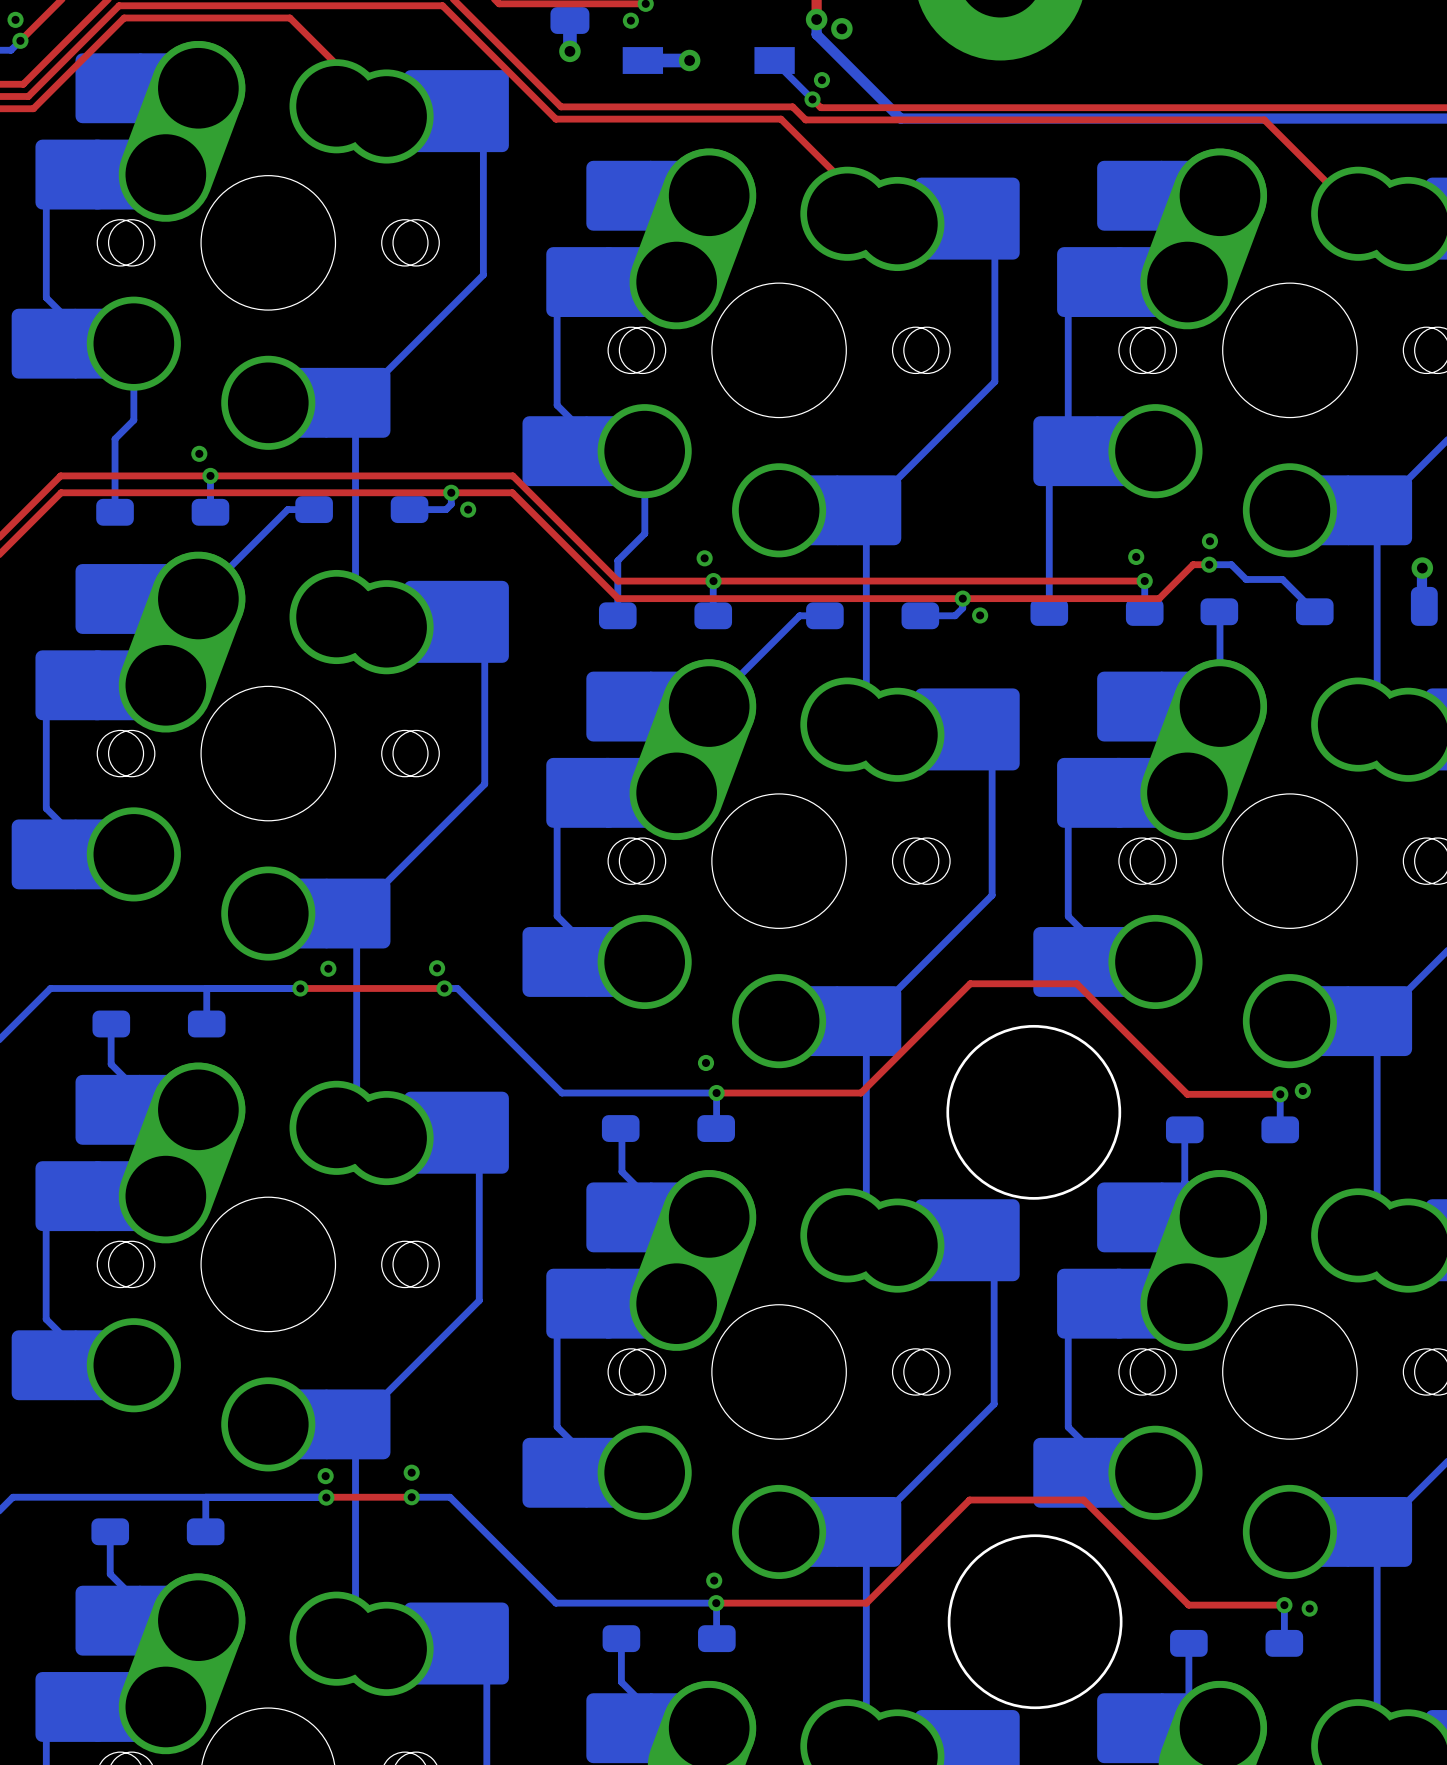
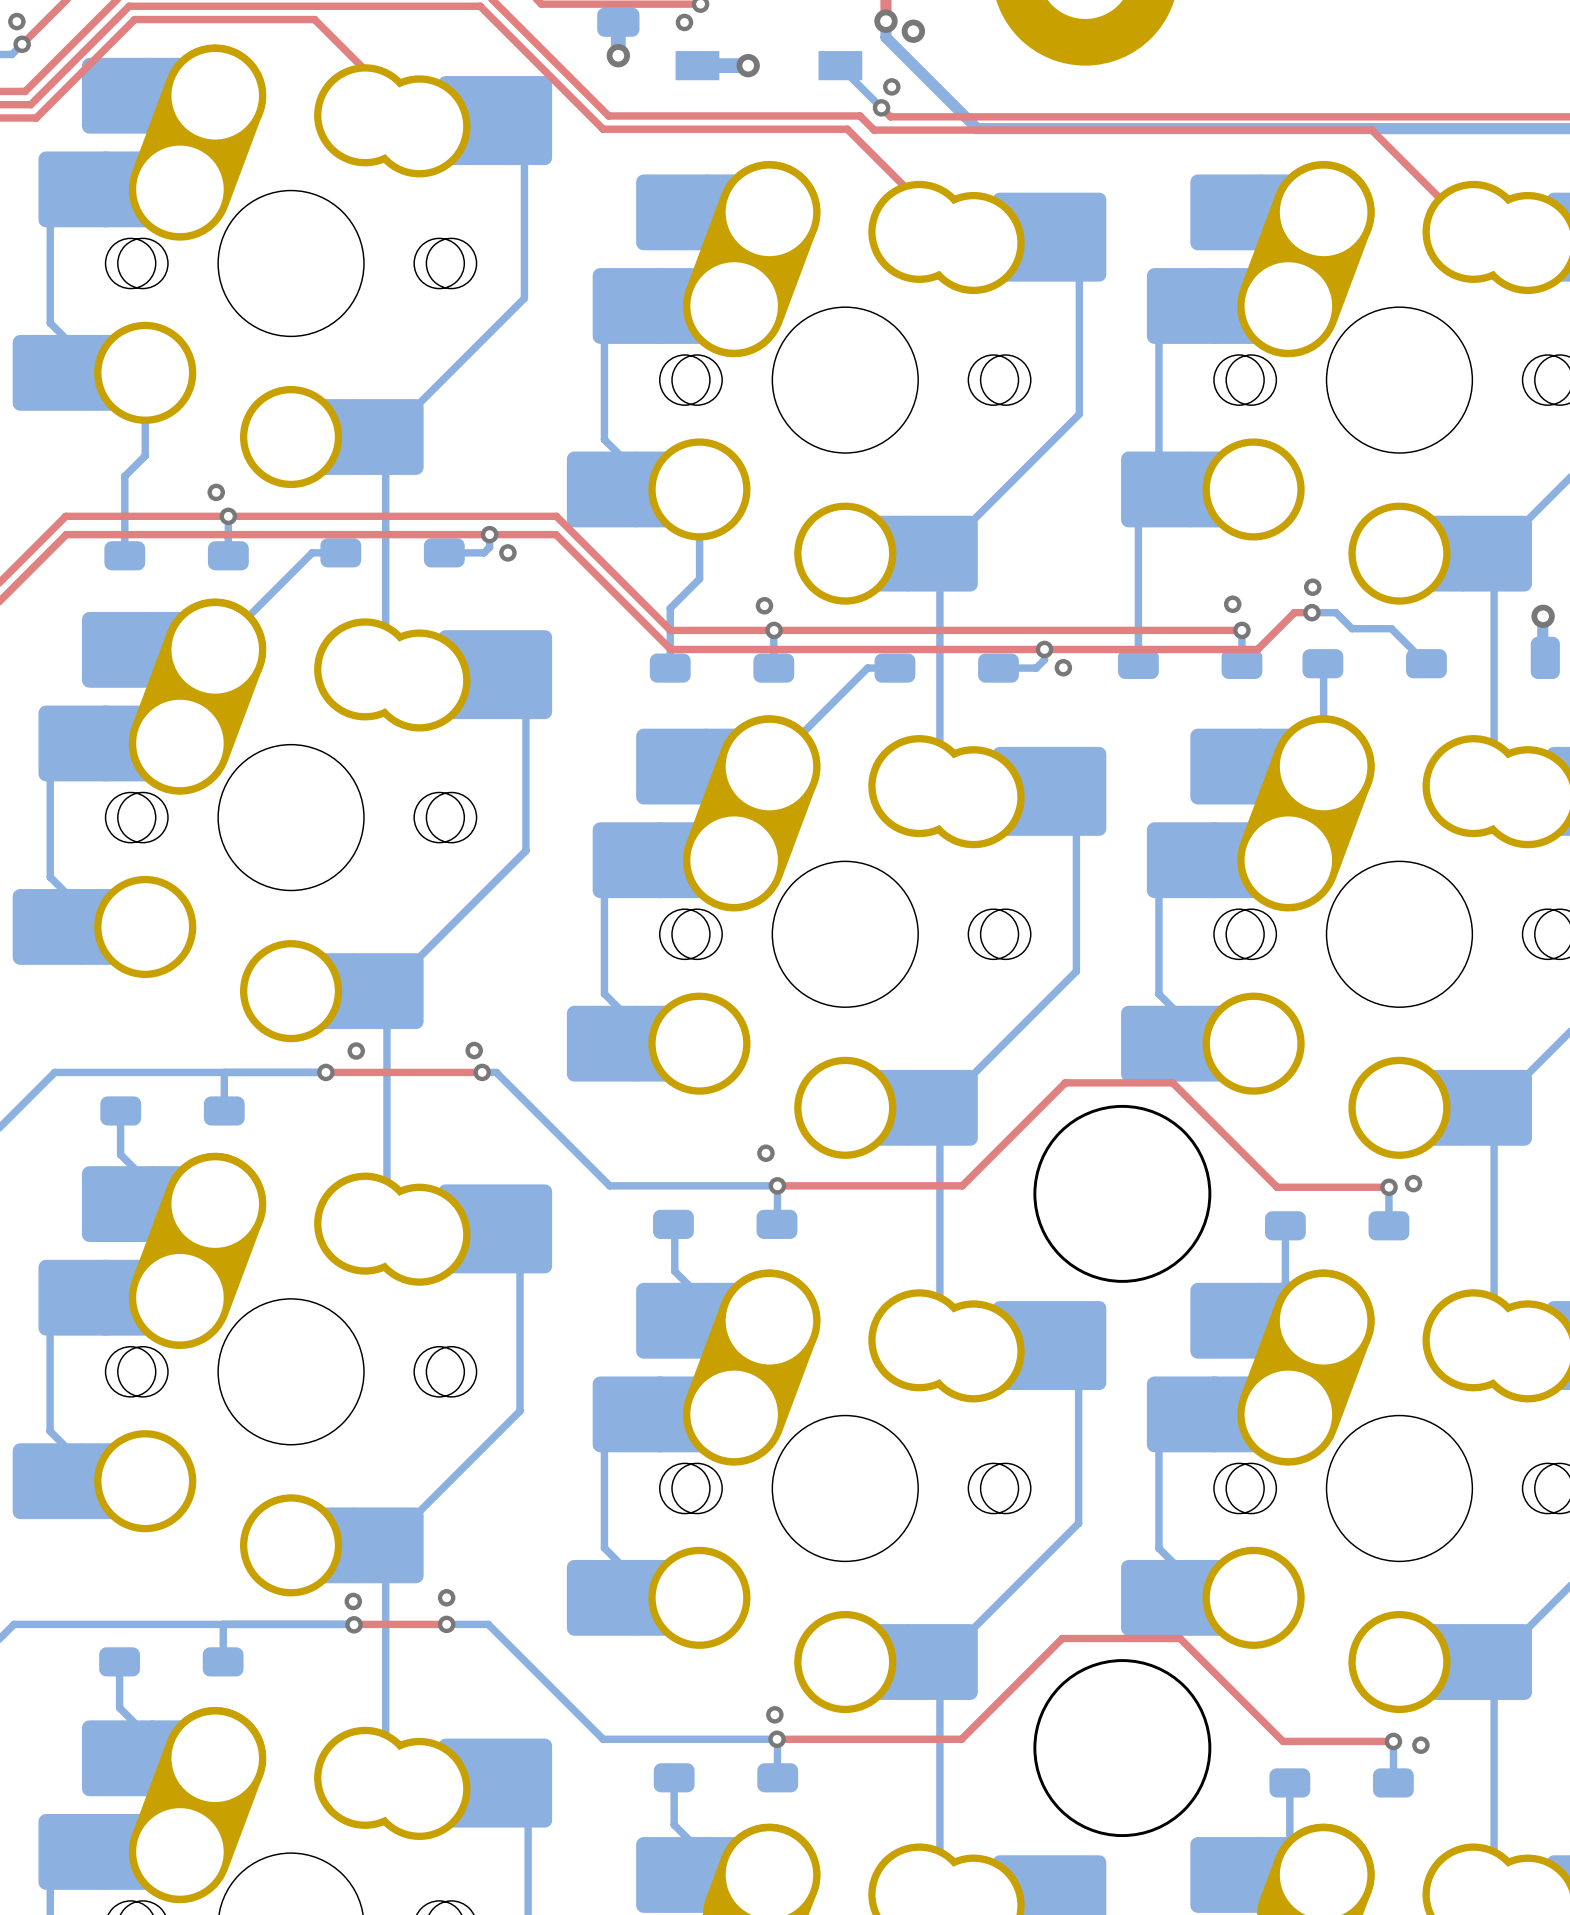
round board edge size: [946, 1024, 1122, 1200] -> [1033, 1104, 1212, 1283]
top track: (861, 1093) (970, 983) (1076, 983) (1187, 1094) -> (934, 1185) (962, 1185) (1065, 1082) (1172, 1082) (1277, 1187) (1288, 1187)
round board edge size: [947, 1534, 1123, 1710] -> [1033, 1659, 1212, 1838]
top track: (866, 1603) (969, 1500) (1083, 1500) (1188, 1605) -> (940, 1739) (961, 1739) (1062, 1638) (1180, 1638) (1283, 1741) (1289, 1741)

